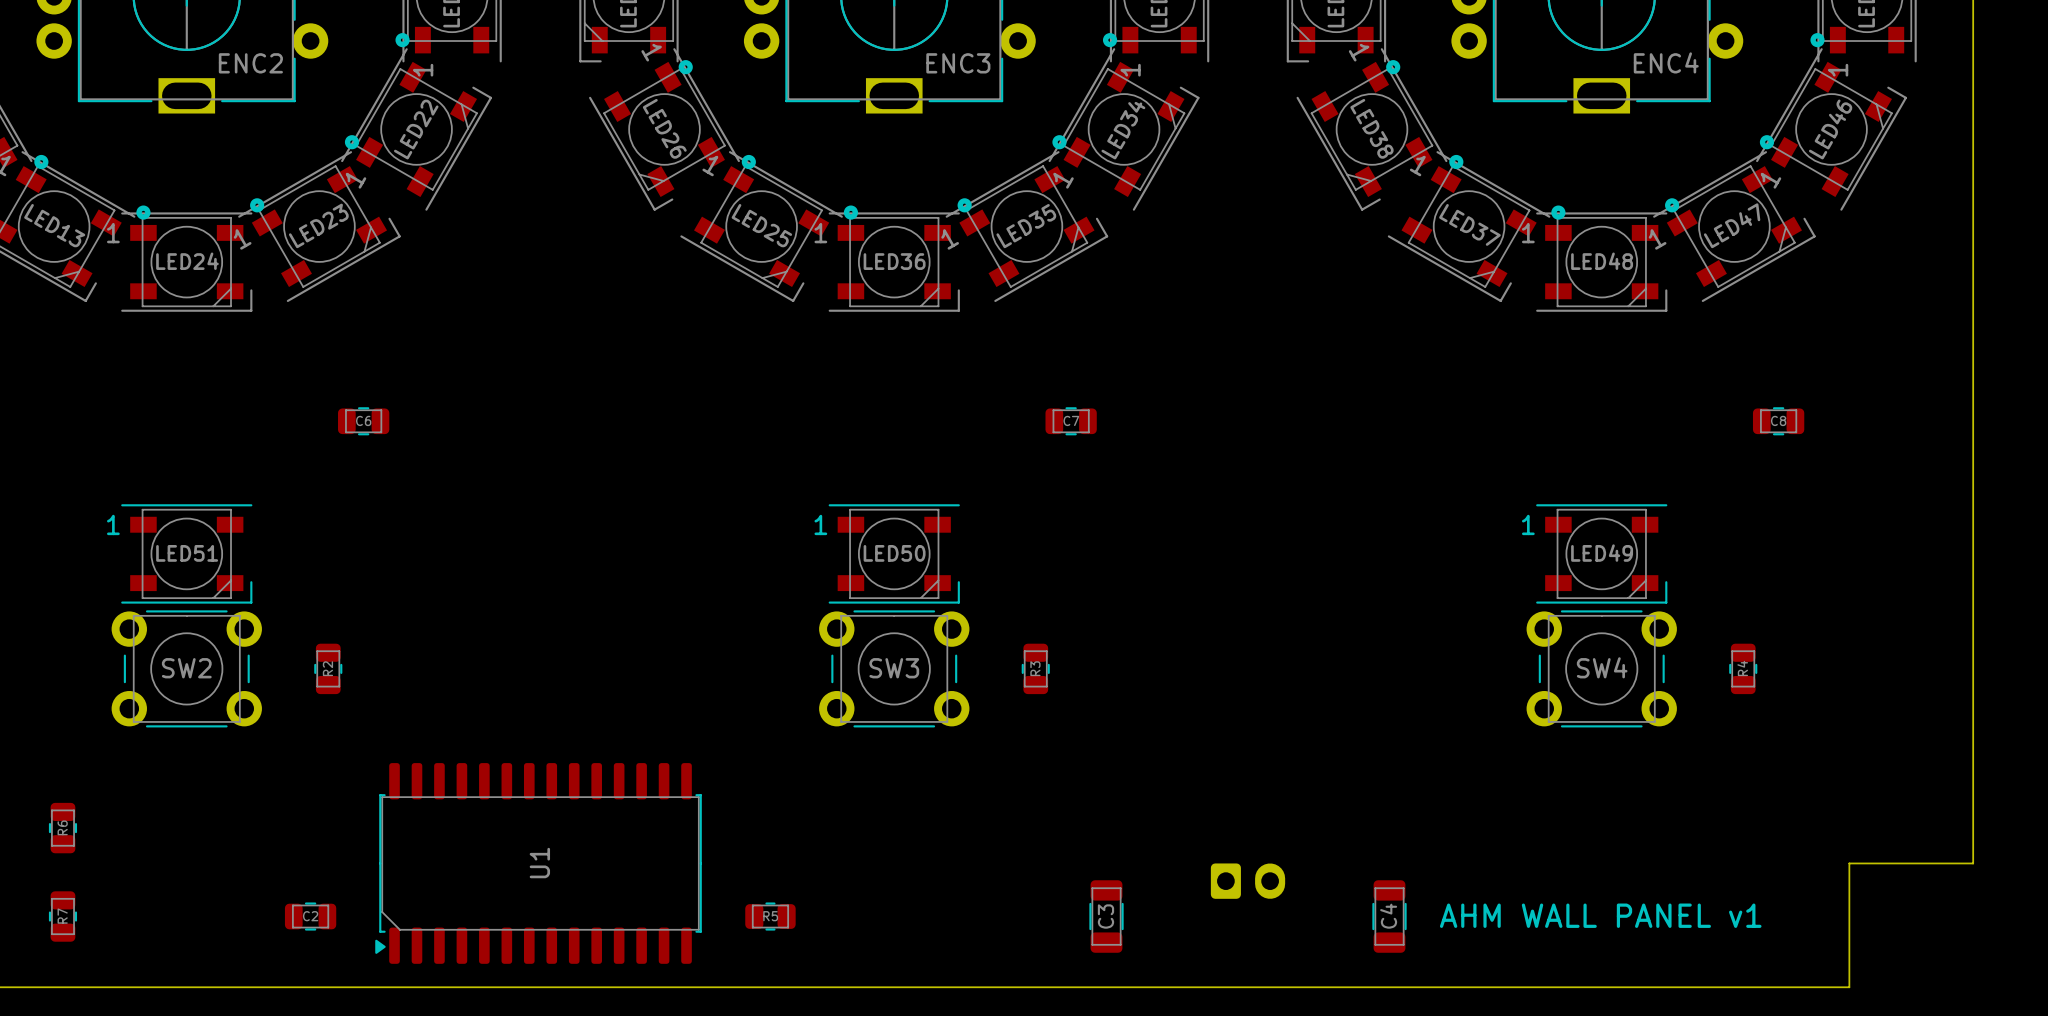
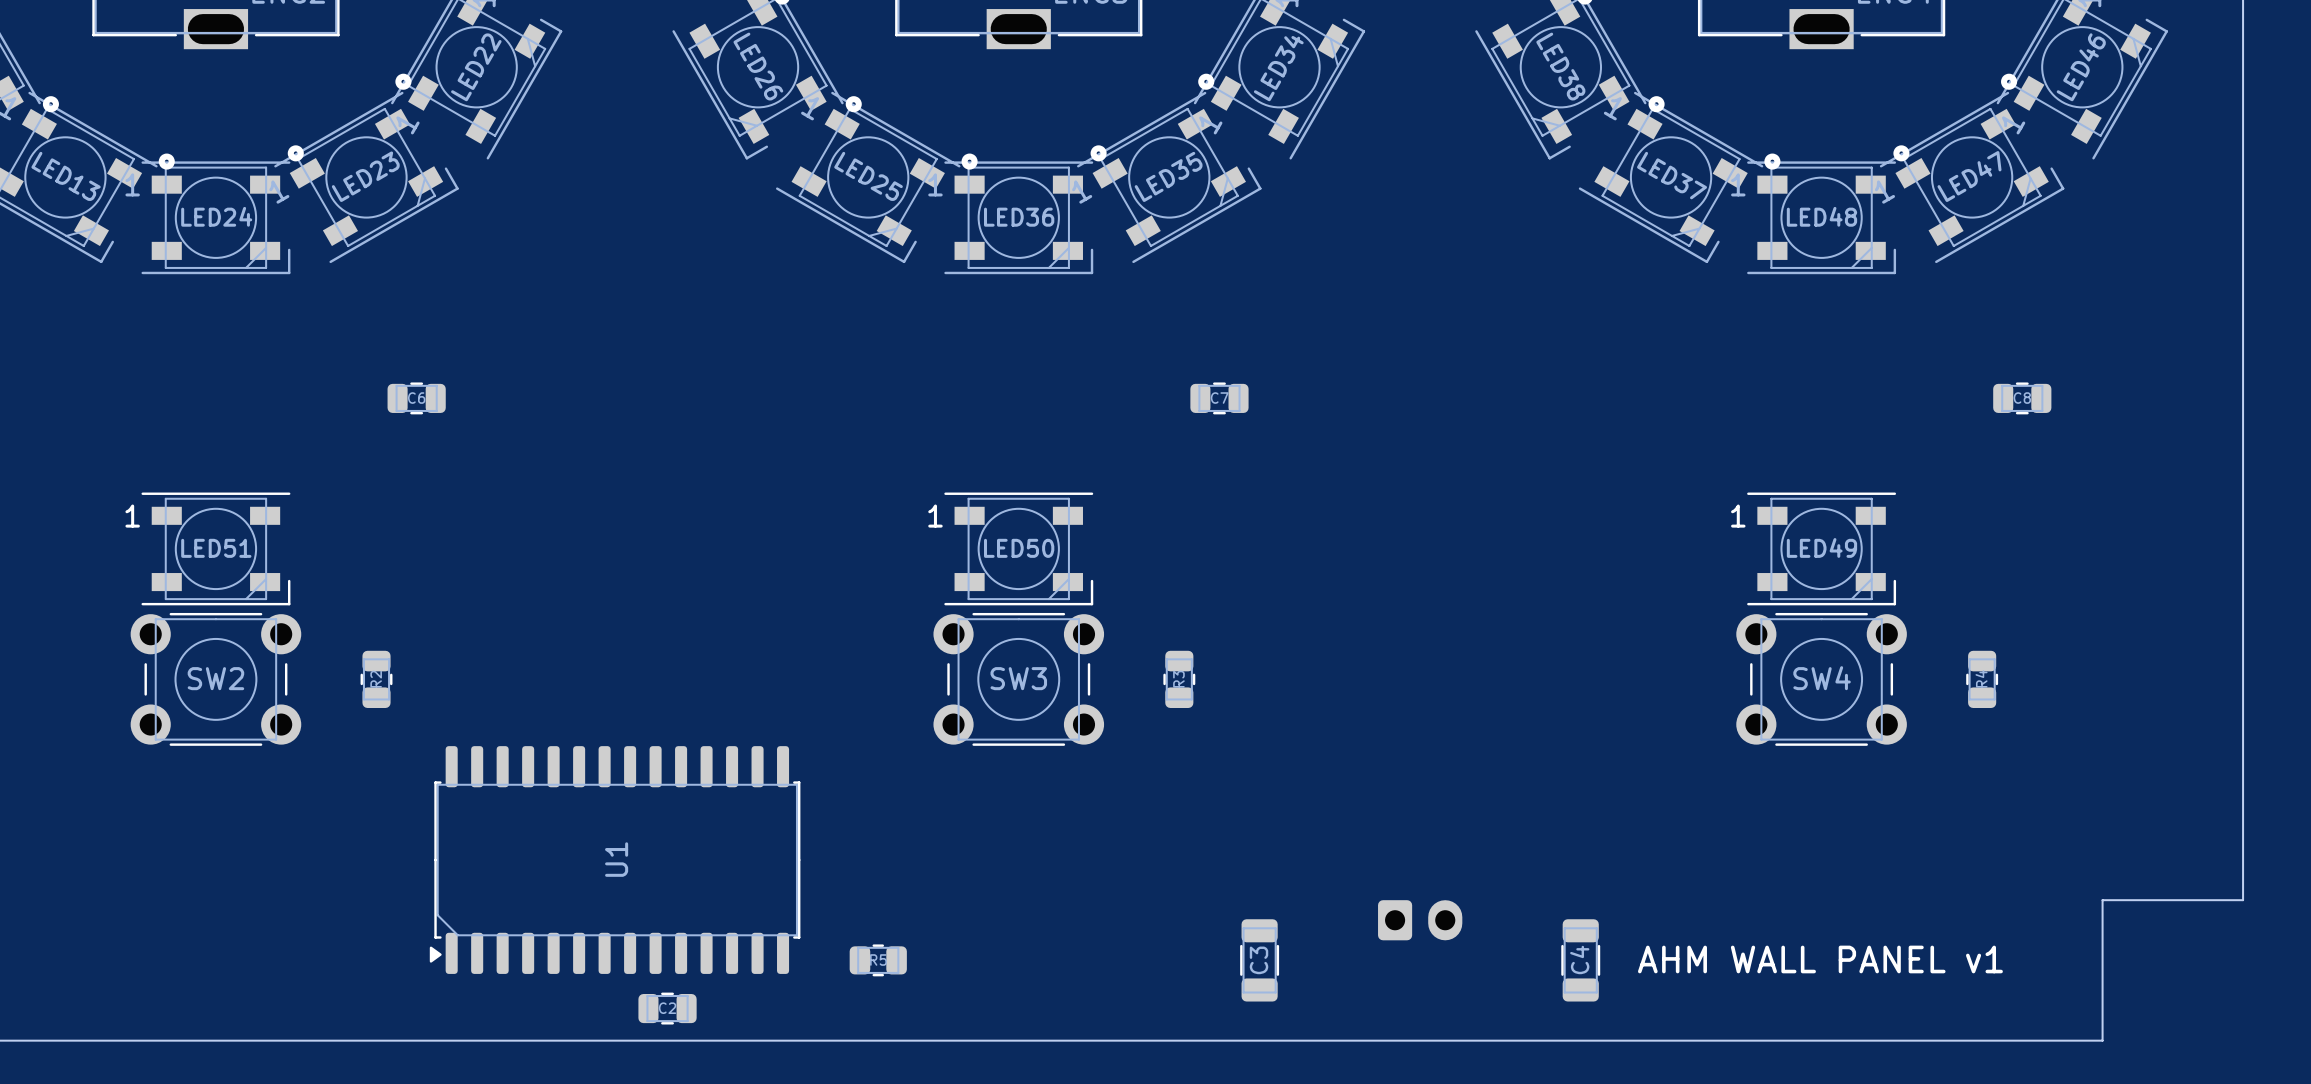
R6: (62, 828) -> none
U1 position: (538, 863) -> (615, 860)
R7: (62, 916) -> none
C2 position: (310, 916) -> (667, 1008)

